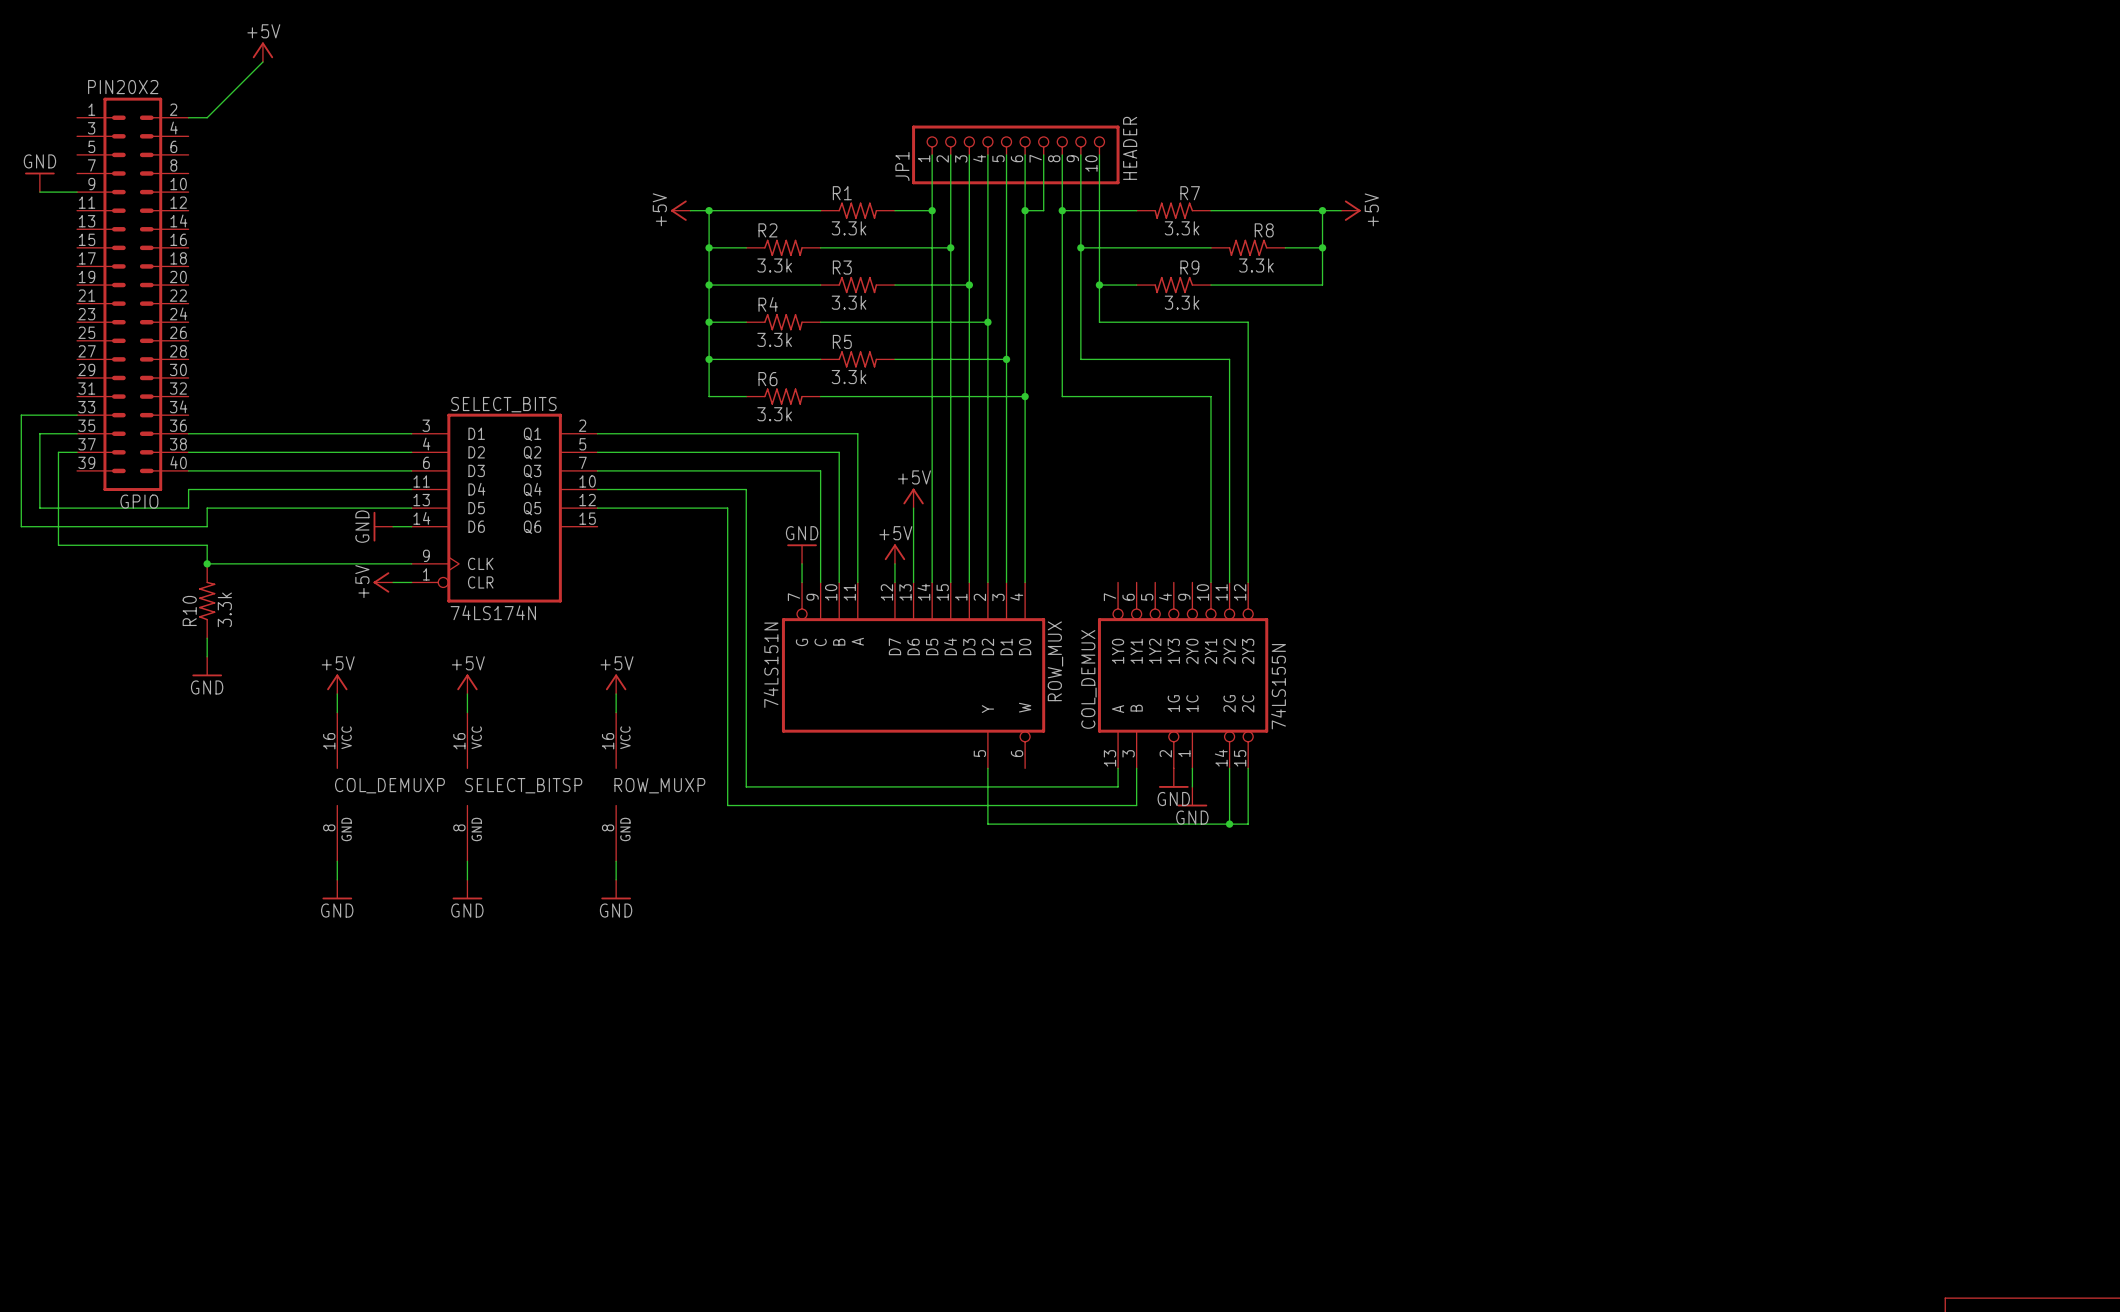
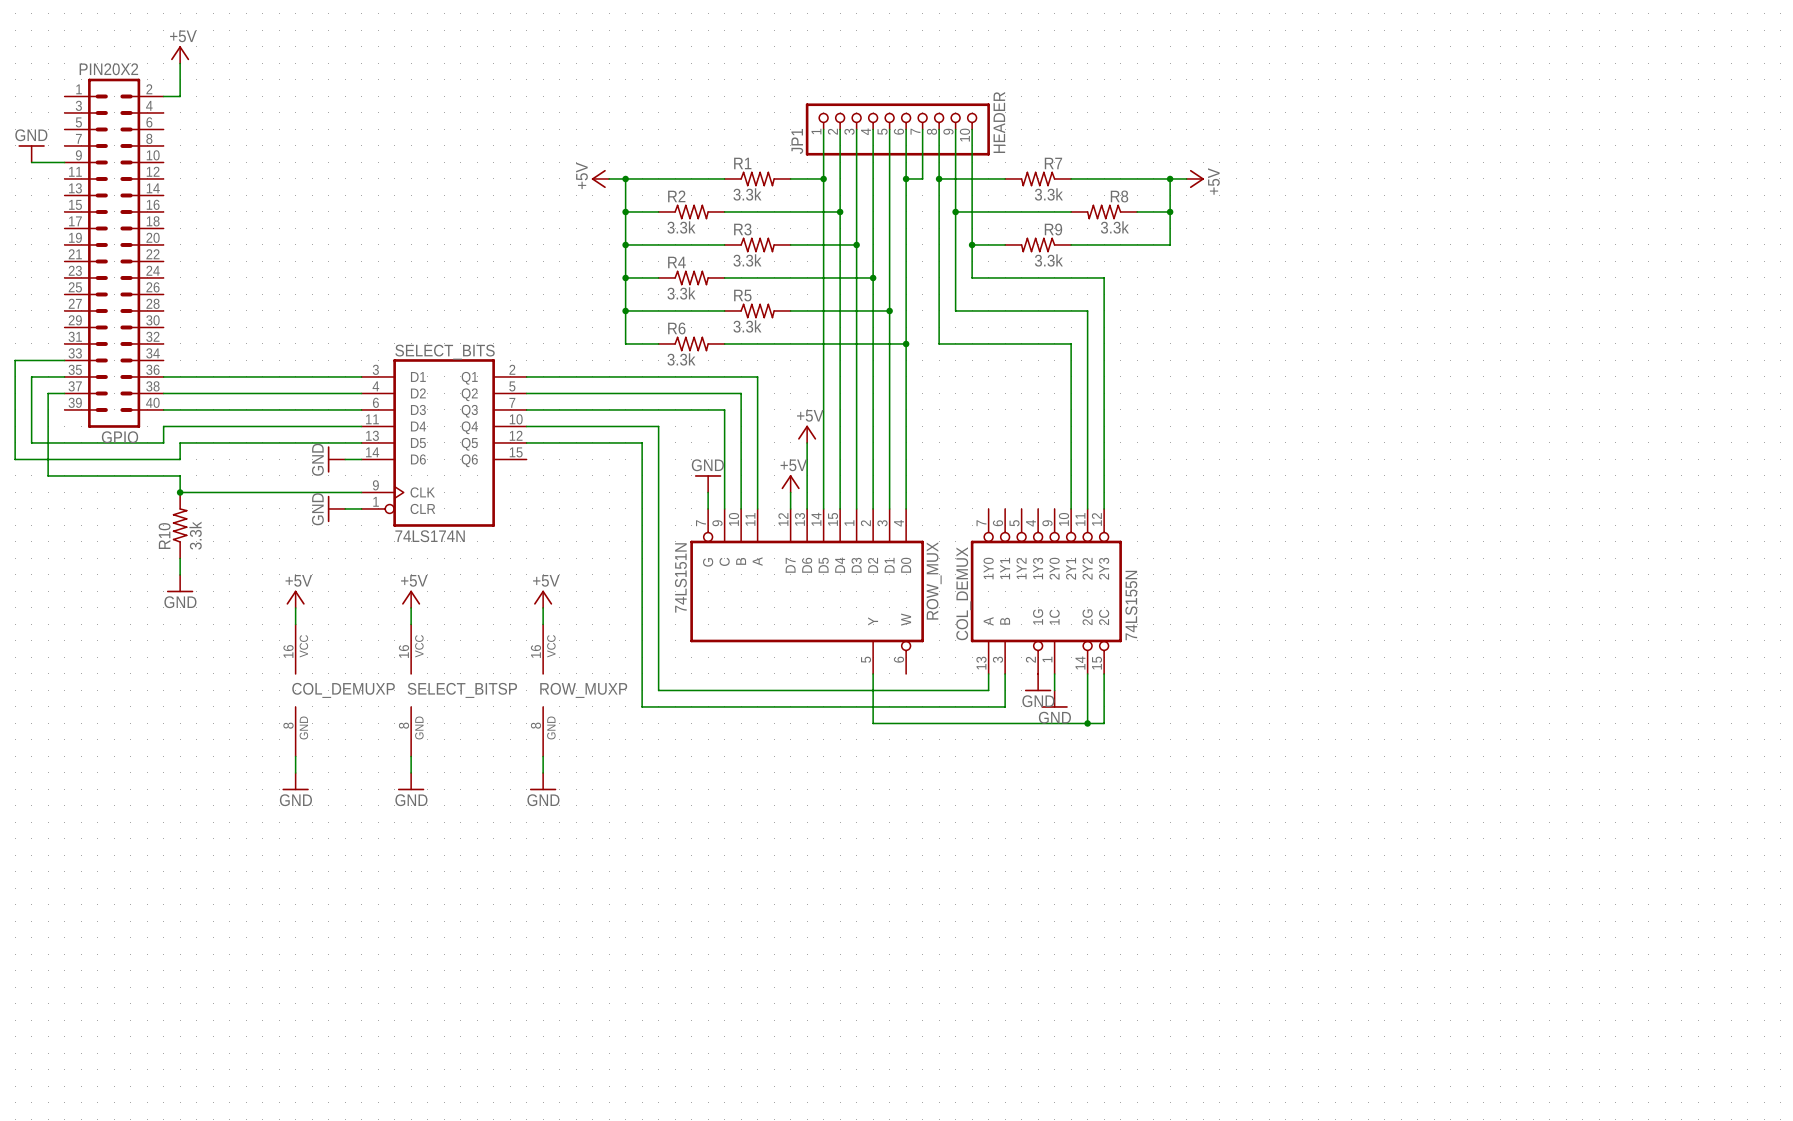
power symbol position: +5V (262, 52) -> +5V (180, 54)
wire: (262, 61) (207, 117) -> (180, 63) (180, 96)
power symbol: +5V (383, 582) -> GND (336, 508)

